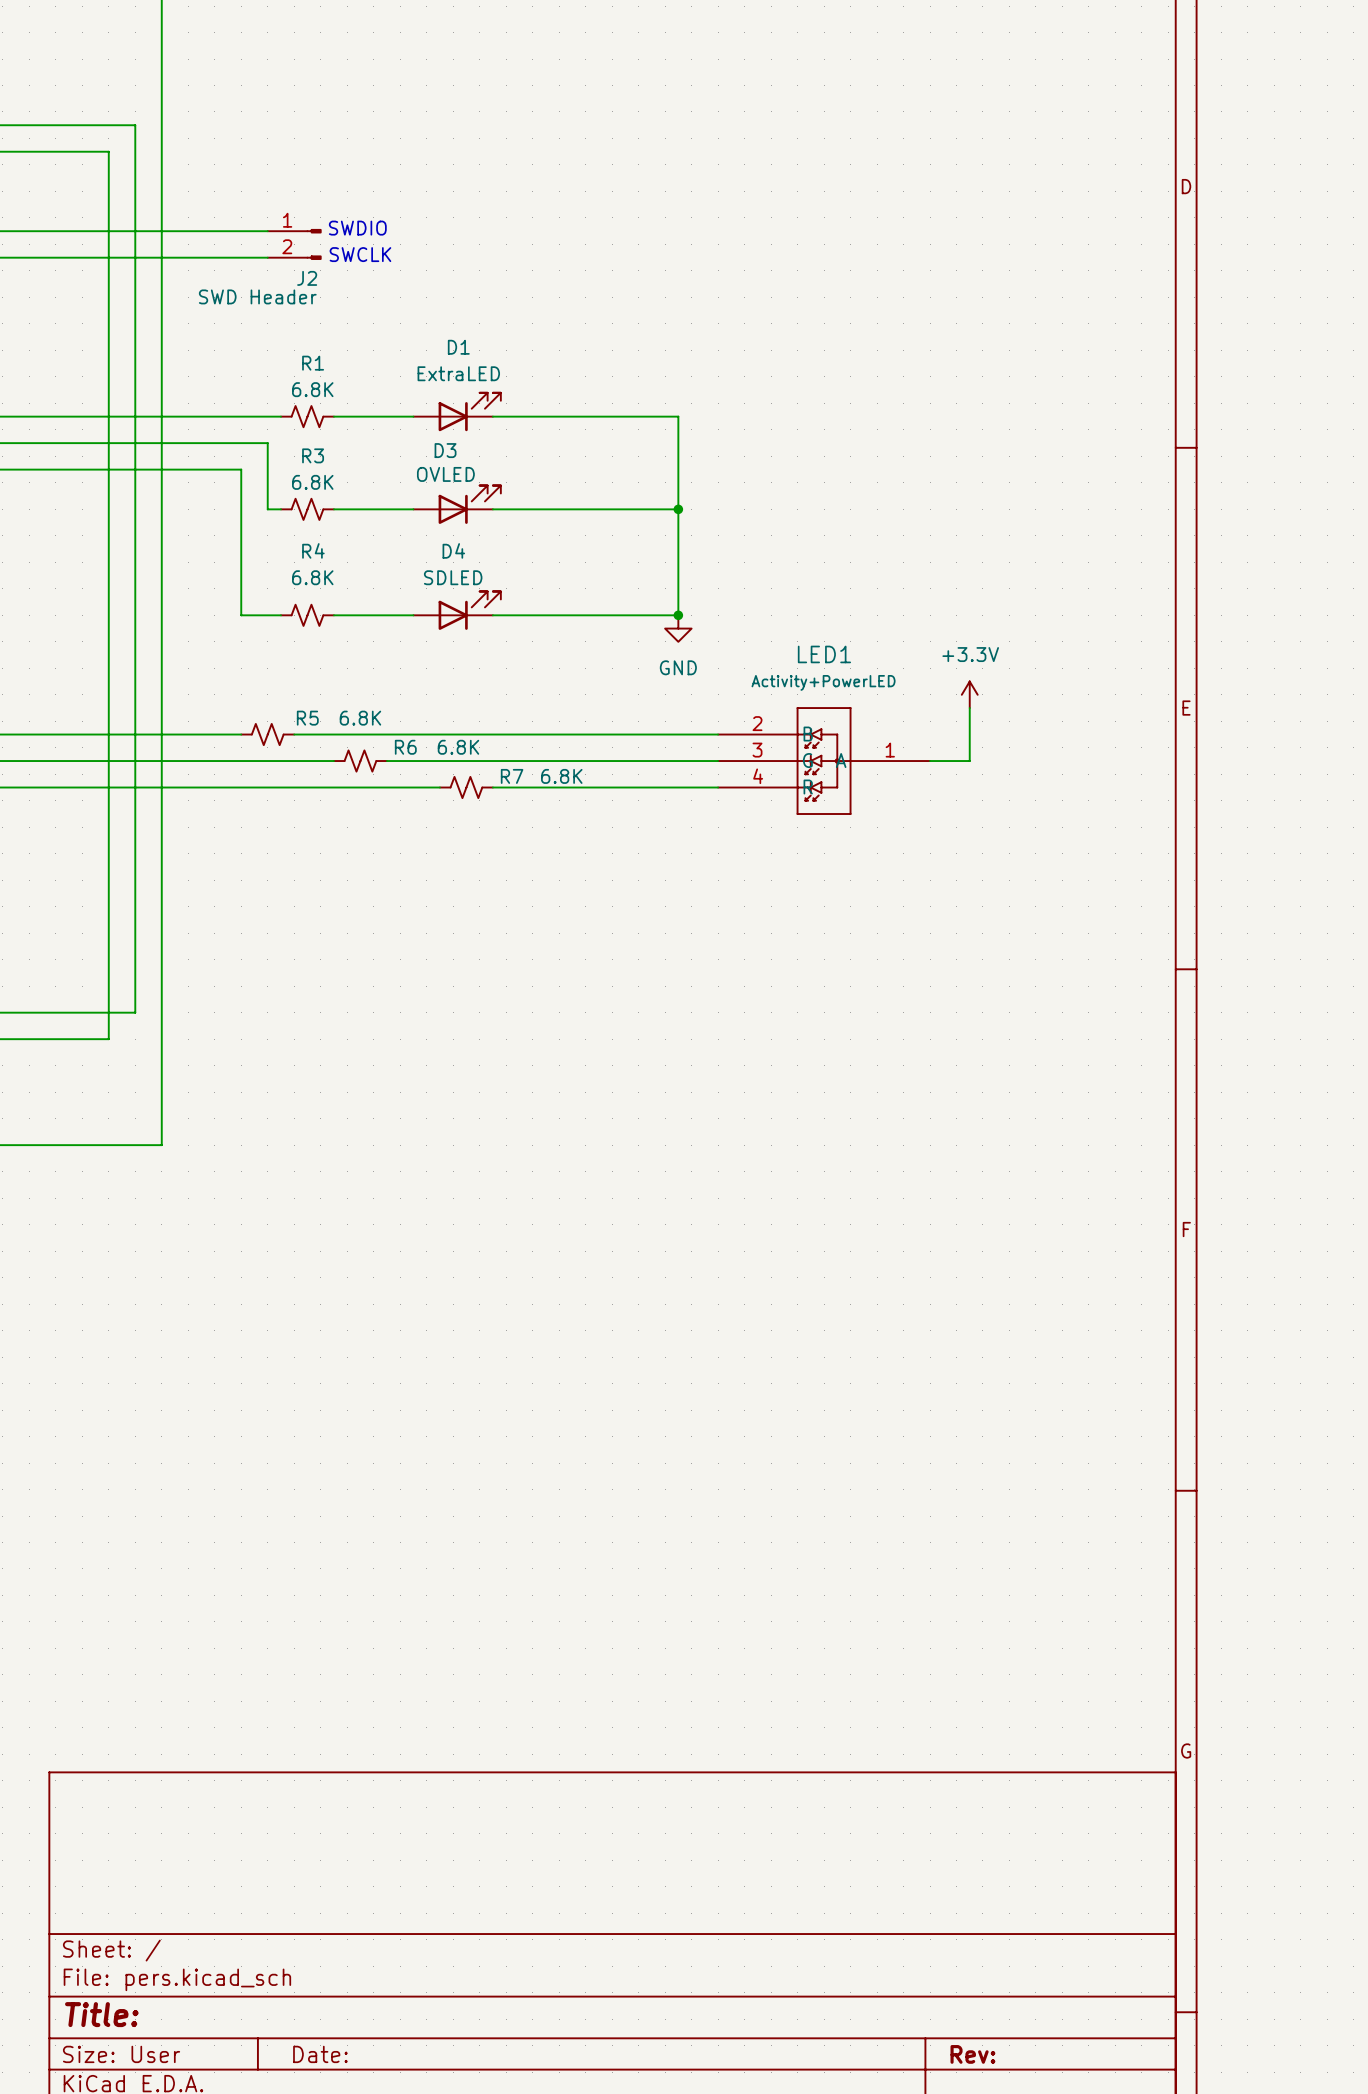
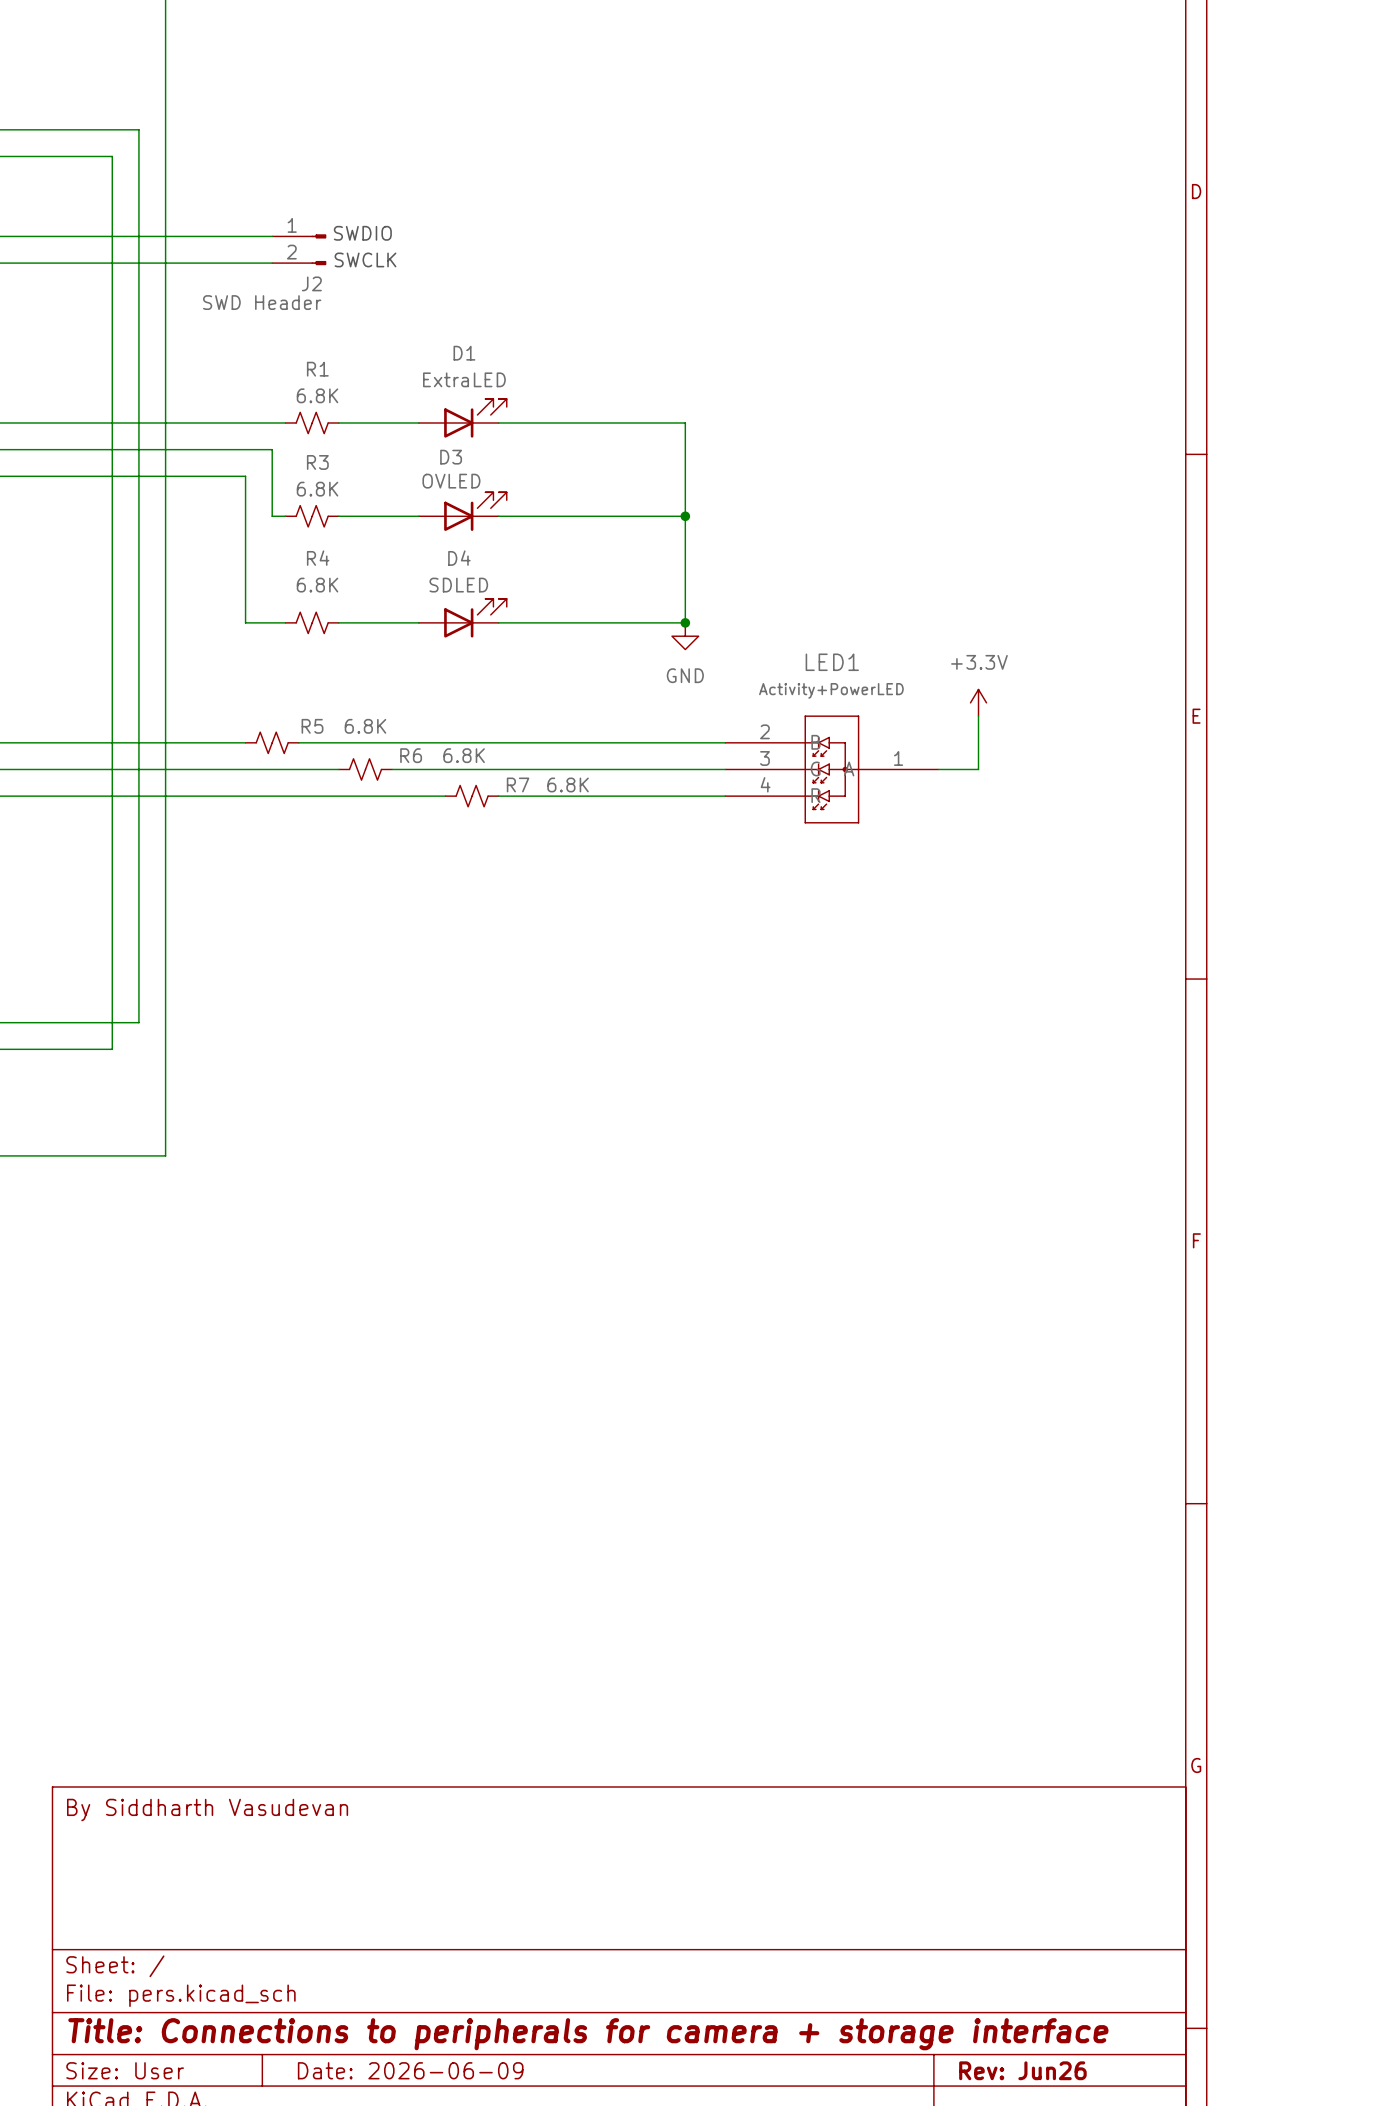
title block: none -> By Siddharth Vasudevan (207, 1810)
title block: Title: (101, 2014) -> Title: Connections to peripherals for camera + storage interface (588, 2034)
title block: Date: (320, 2054) -> Date: 2026-06-09 (410, 2070)
title block: Rev: (972, 2054) -> Rev: Jun26 (1022, 2070)

